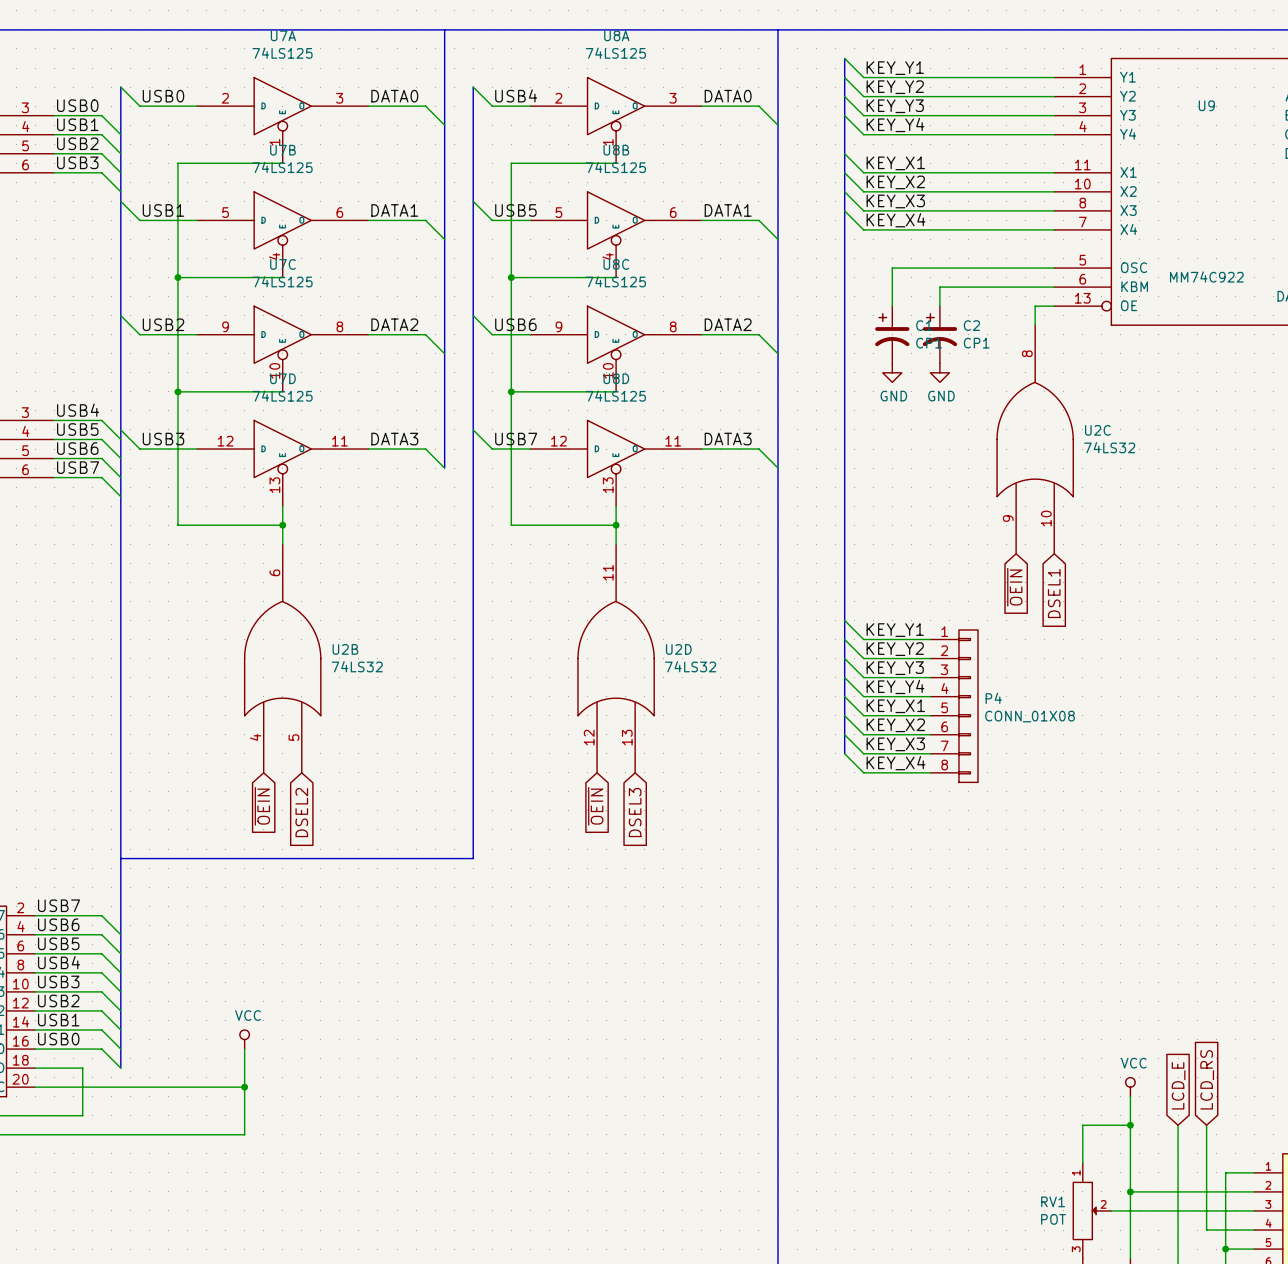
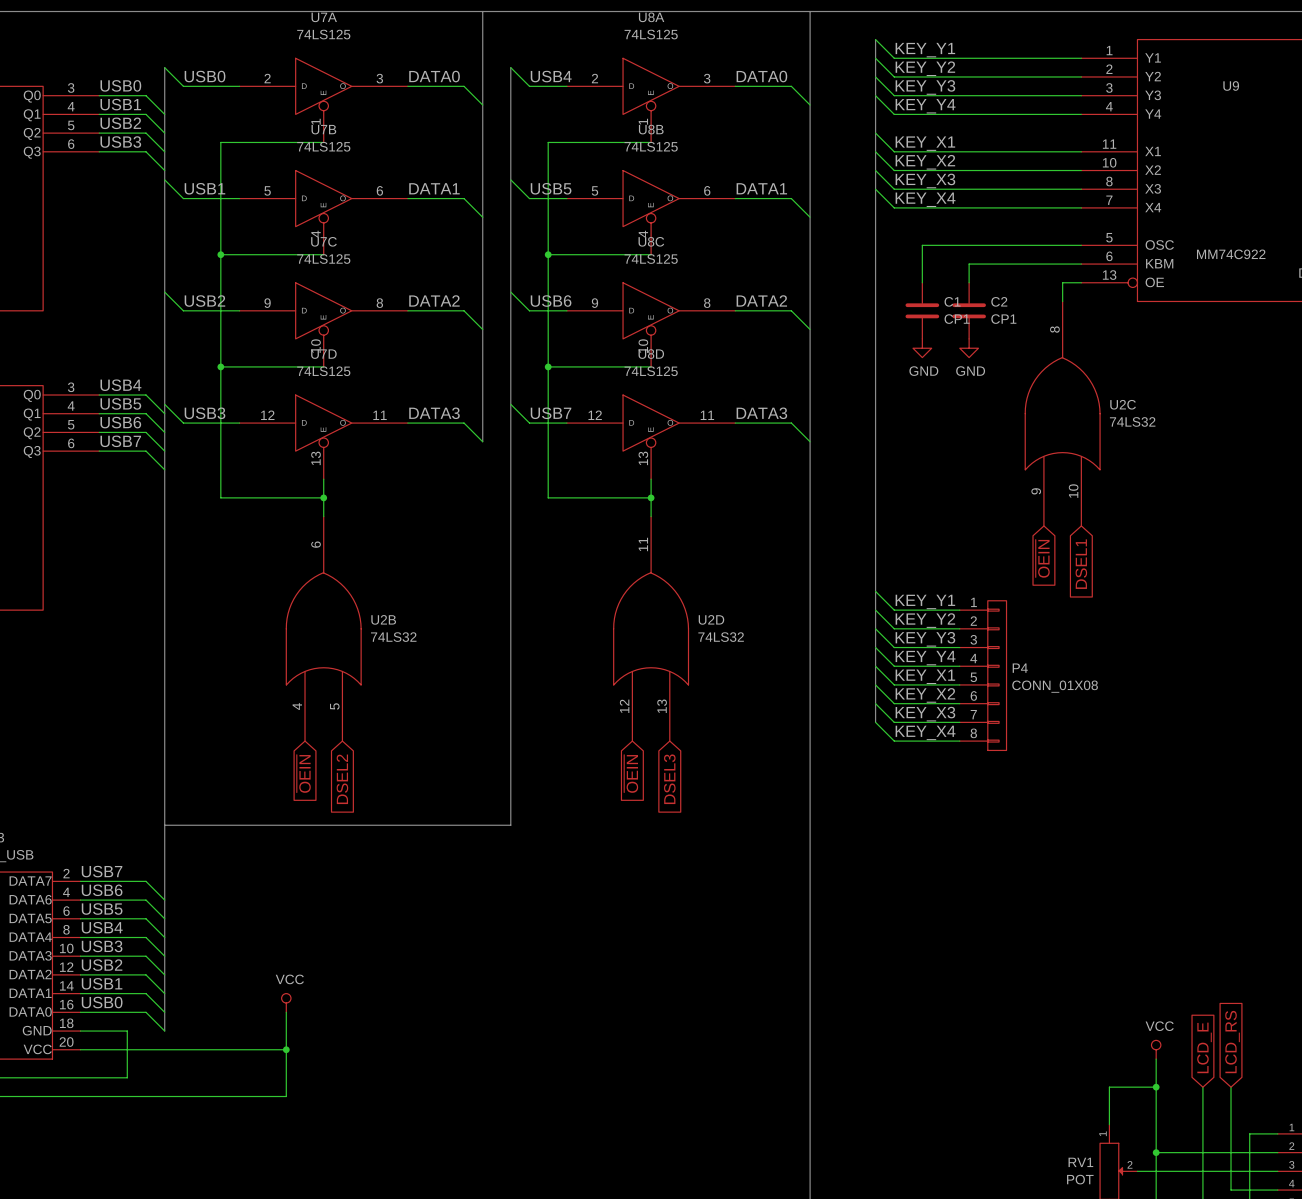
C1 symbol: [875, 306, 910, 364] -> [905, 282, 940, 339]
C2 symbol: [922, 306, 958, 364] -> [952, 282, 986, 339]

